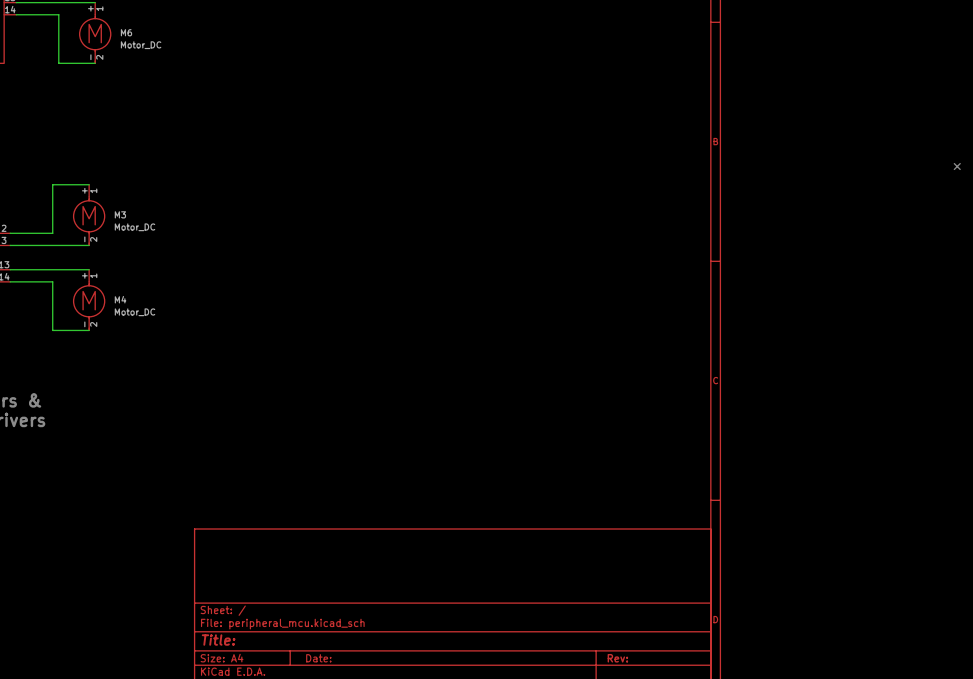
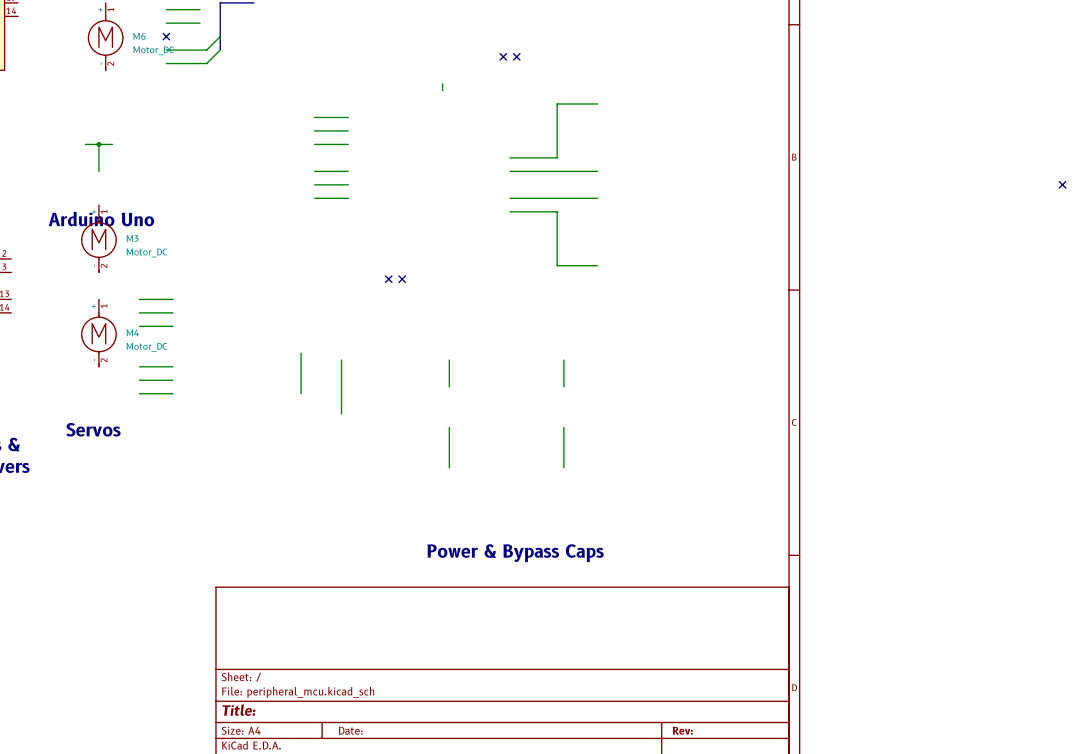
wire: (16, 2) (95, 2) -> none
bus: none -> (253, 2) (220, 2) (220, 50)
wire: none -> (166, 9) (200, 9)
wire: (16, 14) (58, 14) (58, 63) (95, 63) -> none
wire: none -> (166, 23) (200, 23)
no-connect mark: none -> (166, 36)
wire: none -> (220, 36) (206, 50) (166, 50)
wire: none -> (220, 50) (206, 63) (166, 63)
no-connect mark: none -> (503, 56)
no-connect mark: none -> (516, 56)
wire: none -> (442, 83) (442, 90)
wire: none -> (597, 103) (557, 103) (557, 157) (509, 157)
wire: none -> (314, 117) (348, 117)
wire: none -> (314, 130) (348, 130)
wire: none -> (85, 144) (112, 144)
wire: none -> (98, 144) (98, 171)
junction: none -> (98, 144)
wire: none -> (314, 144) (348, 144)
wire: none -> (314, 171) (348, 171)
wire: none -> (509, 171) (597, 171)
wire: none -> (314, 184) (348, 184)
wire: none -> (314, 198) (348, 198)
wire: none -> (509, 198) (597, 198)
wire: (89, 184) (52, 184) (52, 233) (10, 233) -> none
wire: none -> (509, 211) (557, 211) (557, 265) (597, 265)
text: none -> Arduino Uno (101, 219)
wire: (10, 245) (89, 245) -> none
no-connect mark: none -> (388, 279)
no-connect mark: none -> (402, 279)
wire: (10, 269) (89, 269) -> none
wire: none -> (139, 299) (173, 299)
wire: (10, 281) (52, 281) (52, 330) (89, 330) -> none
wire: none -> (139, 312) (173, 312)
wire: none -> (139, 326) (173, 326)
wire: none -> (301, 353) (301, 393)
wire: none -> (341, 360) (341, 413)
wire: none -> (449, 360) (449, 387)
wire: none -> (563, 360) (563, 387)
wire: none -> (139, 366) (173, 366)
wire: none -> (139, 380) (173, 380)
wire: none -> (139, 393) (173, 393)
wire: none -> (449, 427) (449, 467)
wire: none -> (563, 427) (563, 467)
text: none -> Servos (93, 429)
text: none -> Power & Bypass Caps (515, 553)

